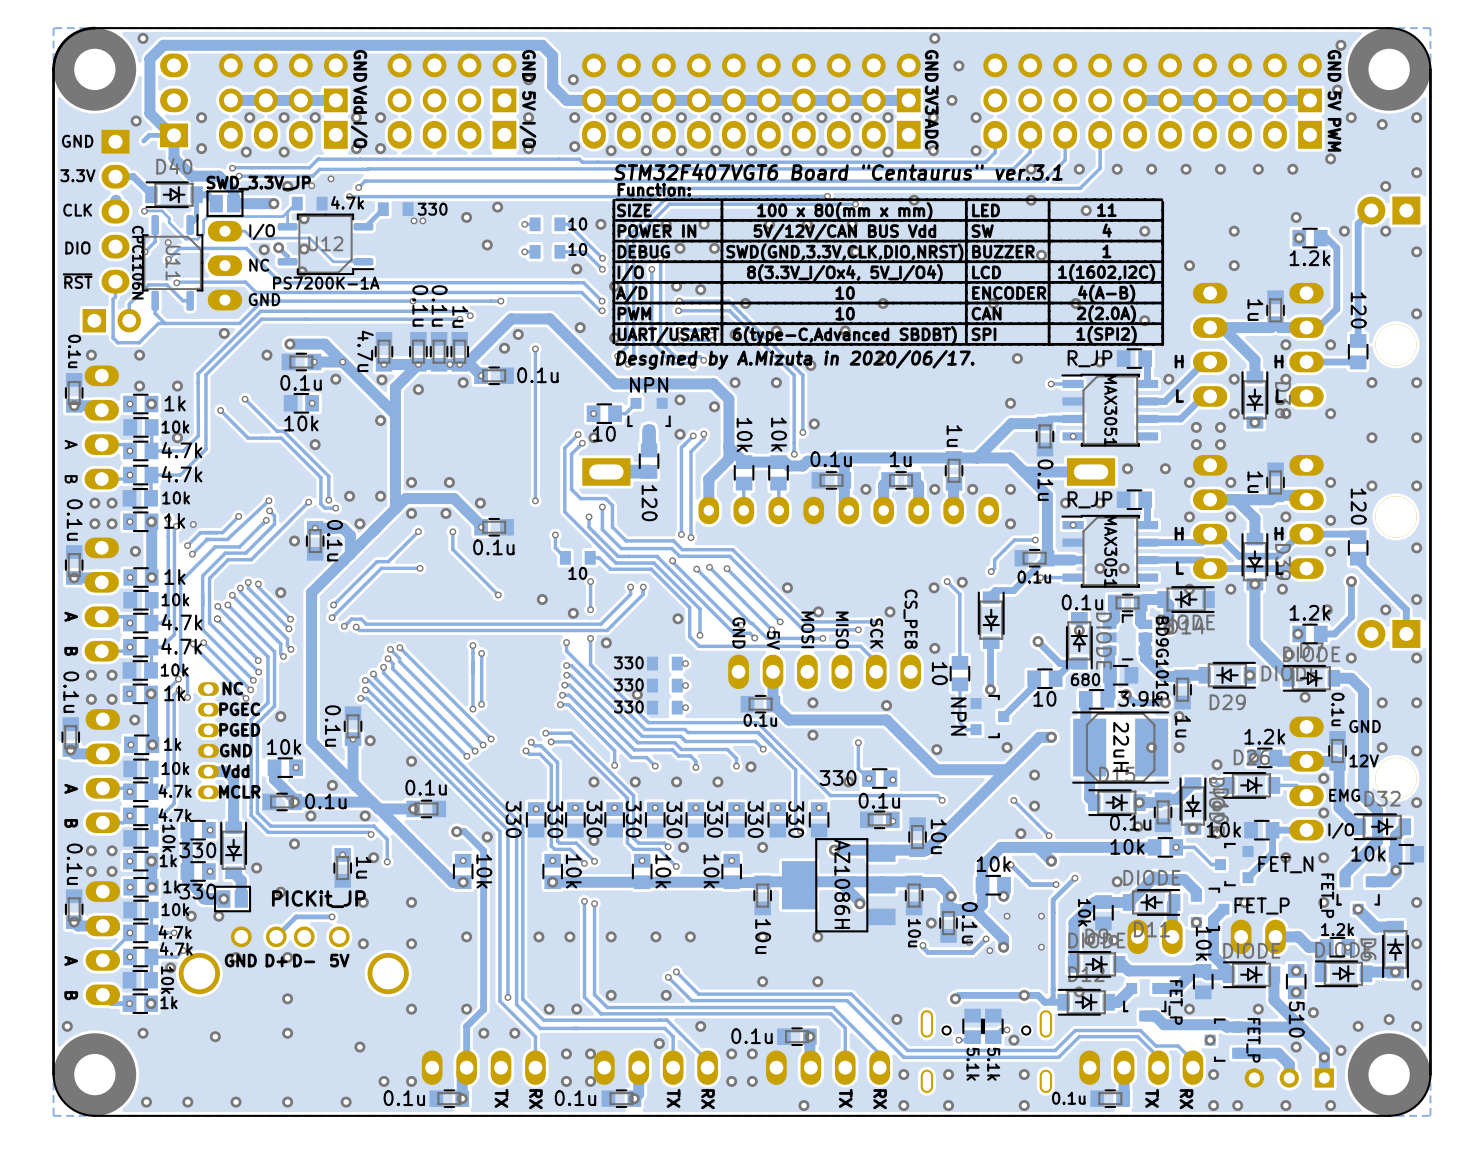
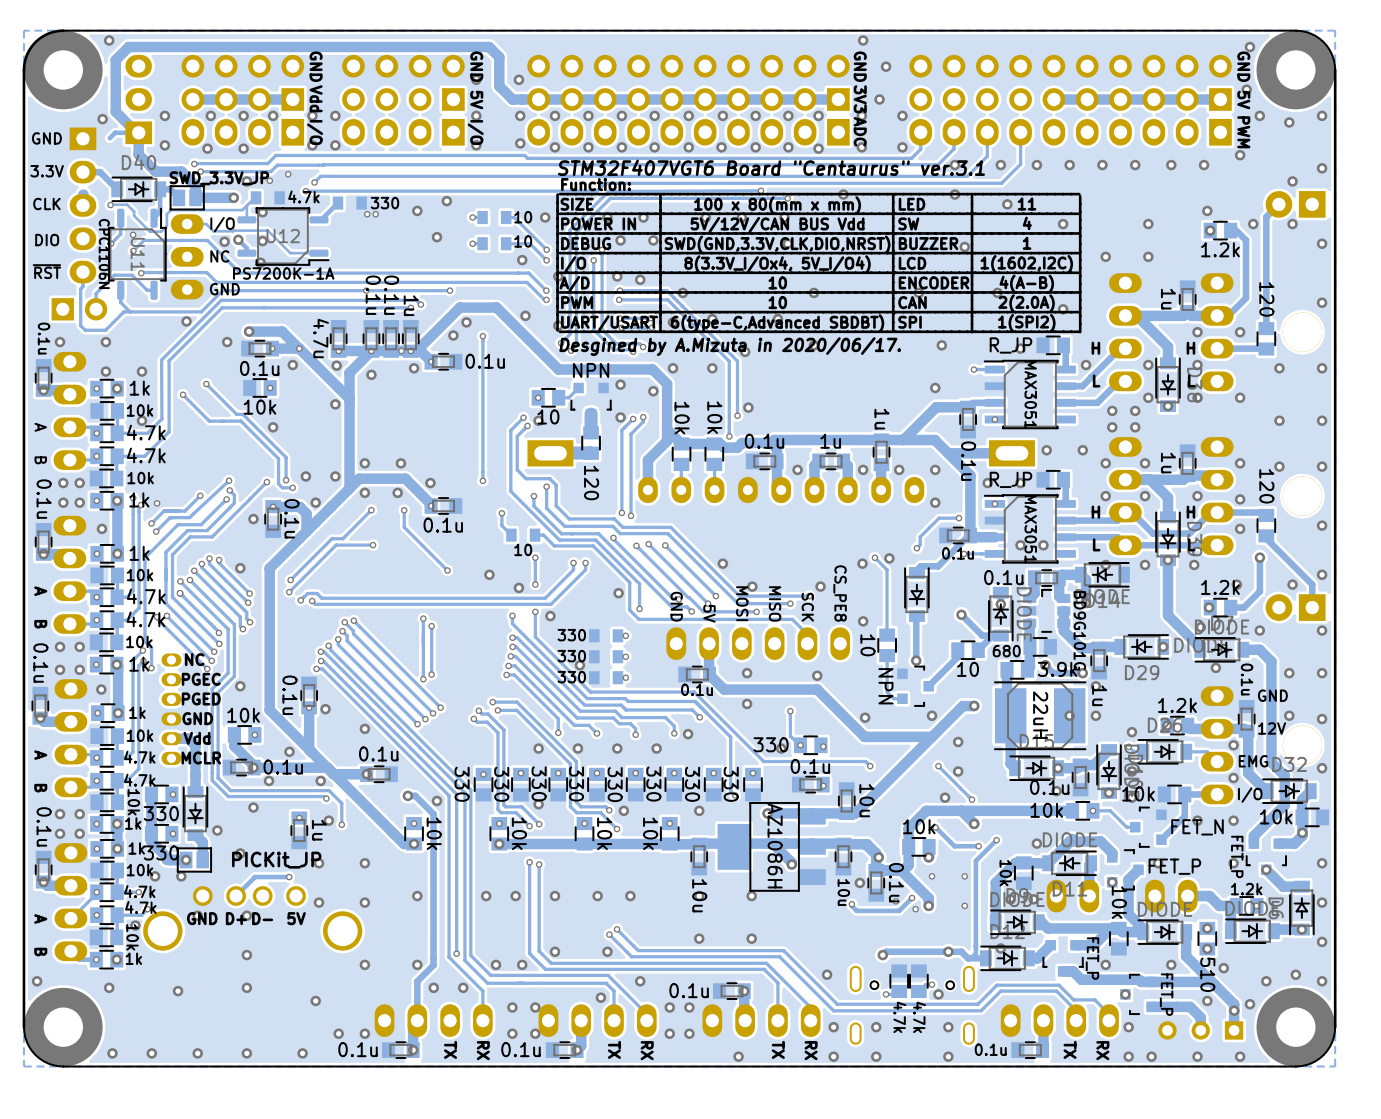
part value: 5.1k (973, 1064) -> 4.7k (899, 1017)
part value: 5.1k (993, 1064) -> 4.7k (919, 1017)

